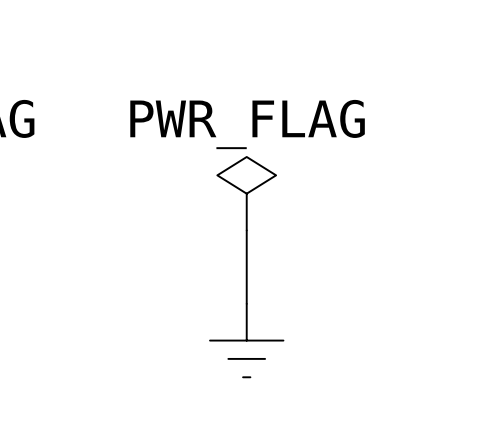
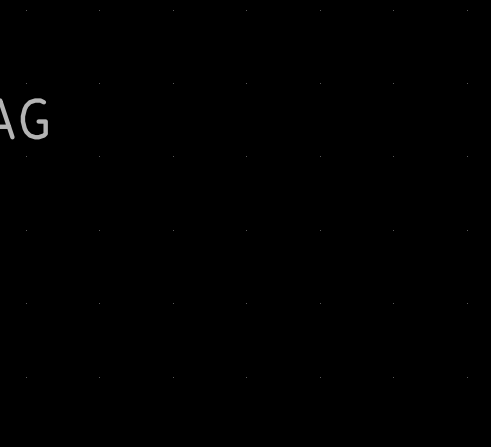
power symbol: PWR_FLAG (246, 193) -> none
wire: (246, 230) (246, 303) -> none
power symbol: (246, 340) -> none

